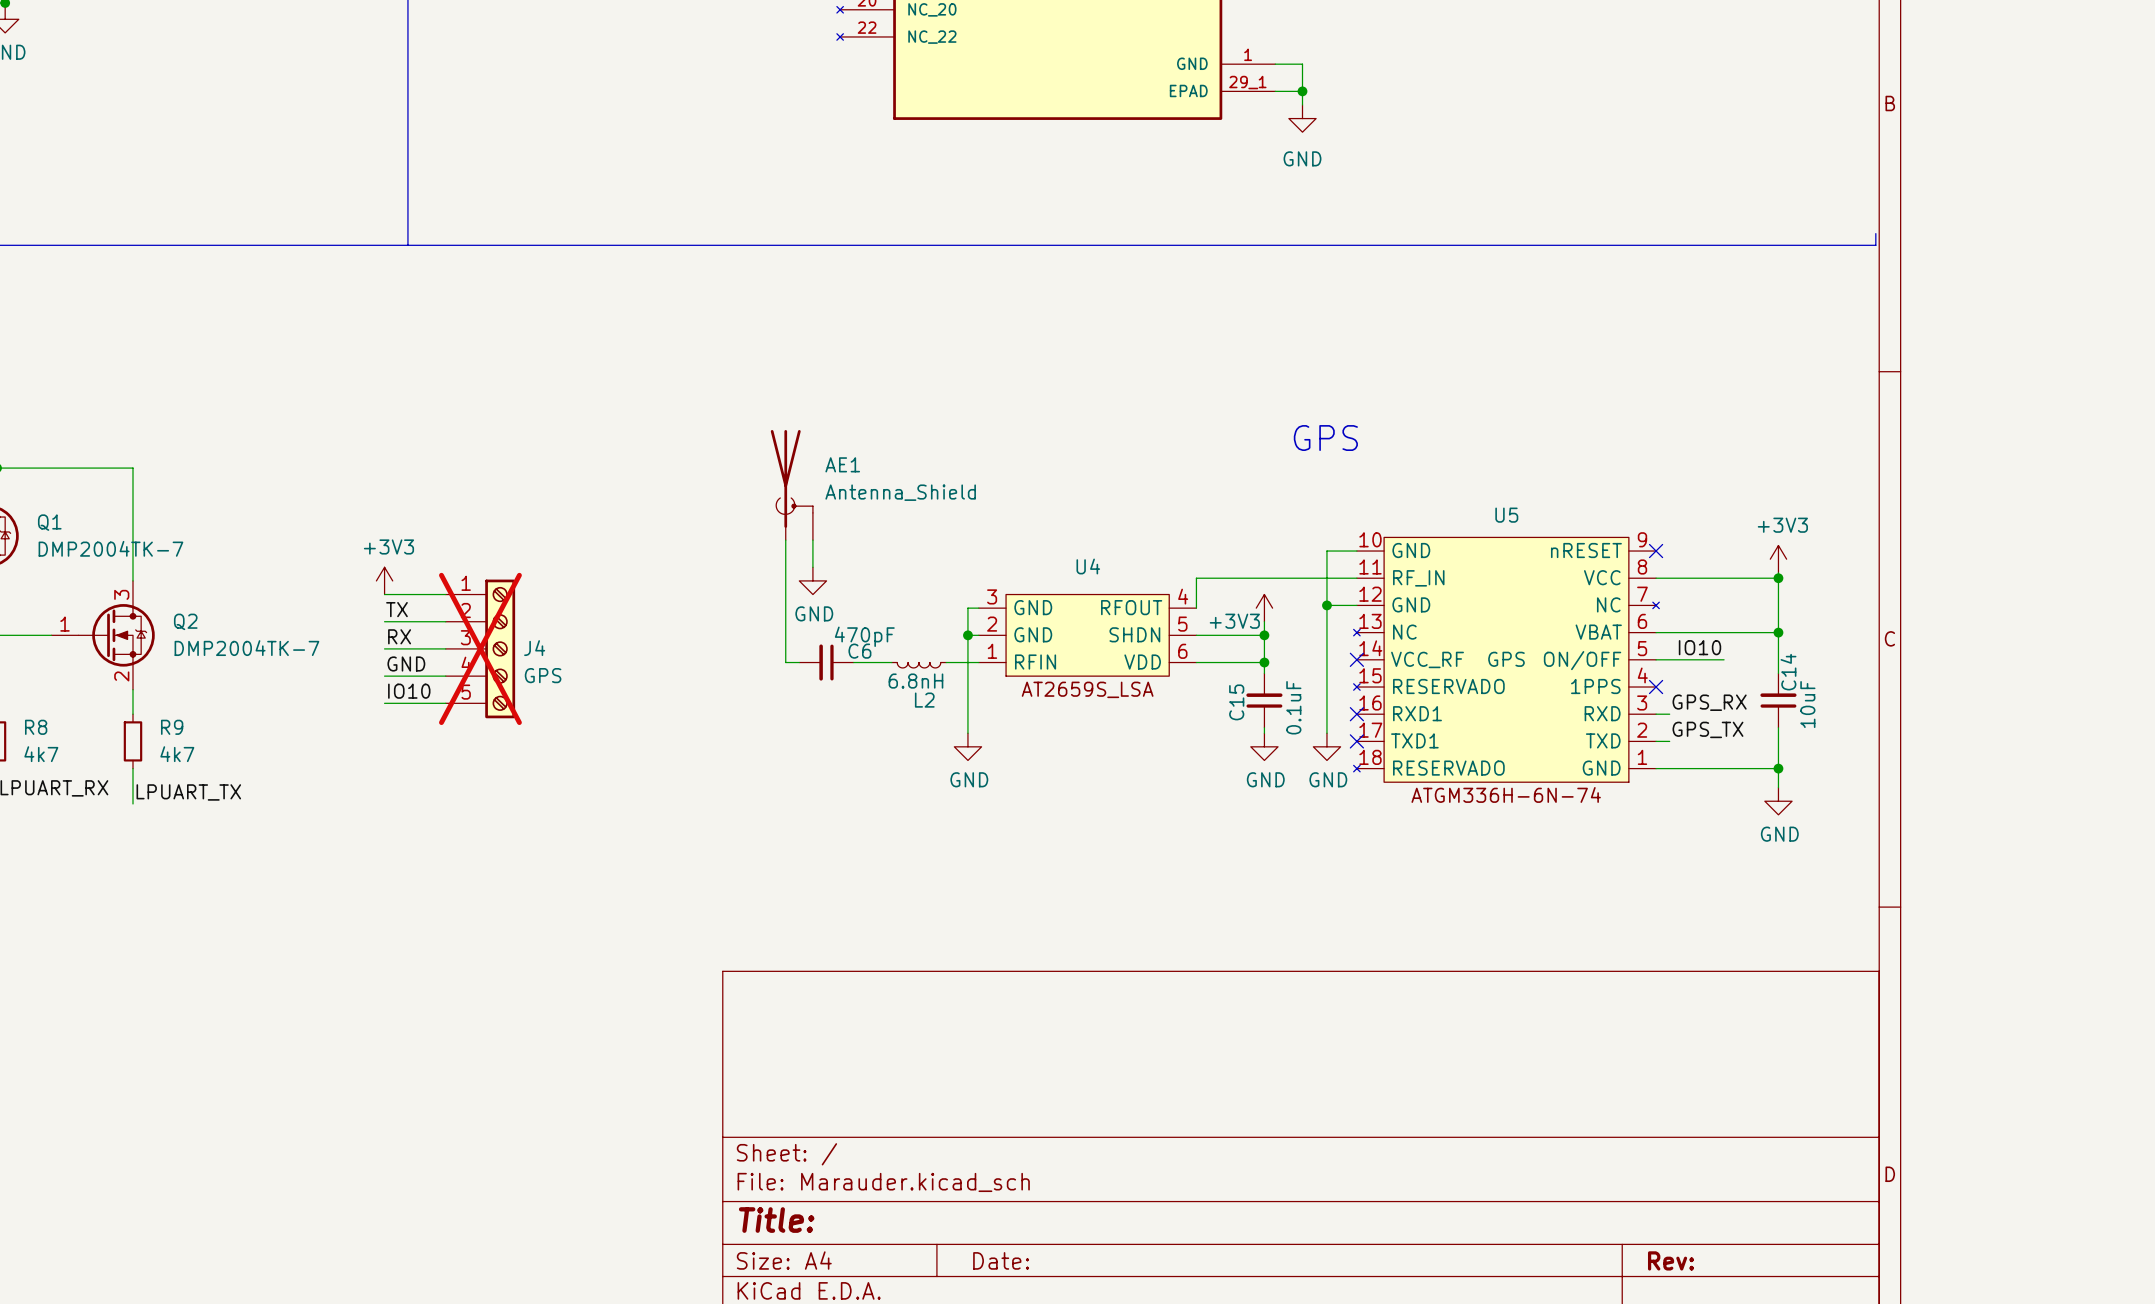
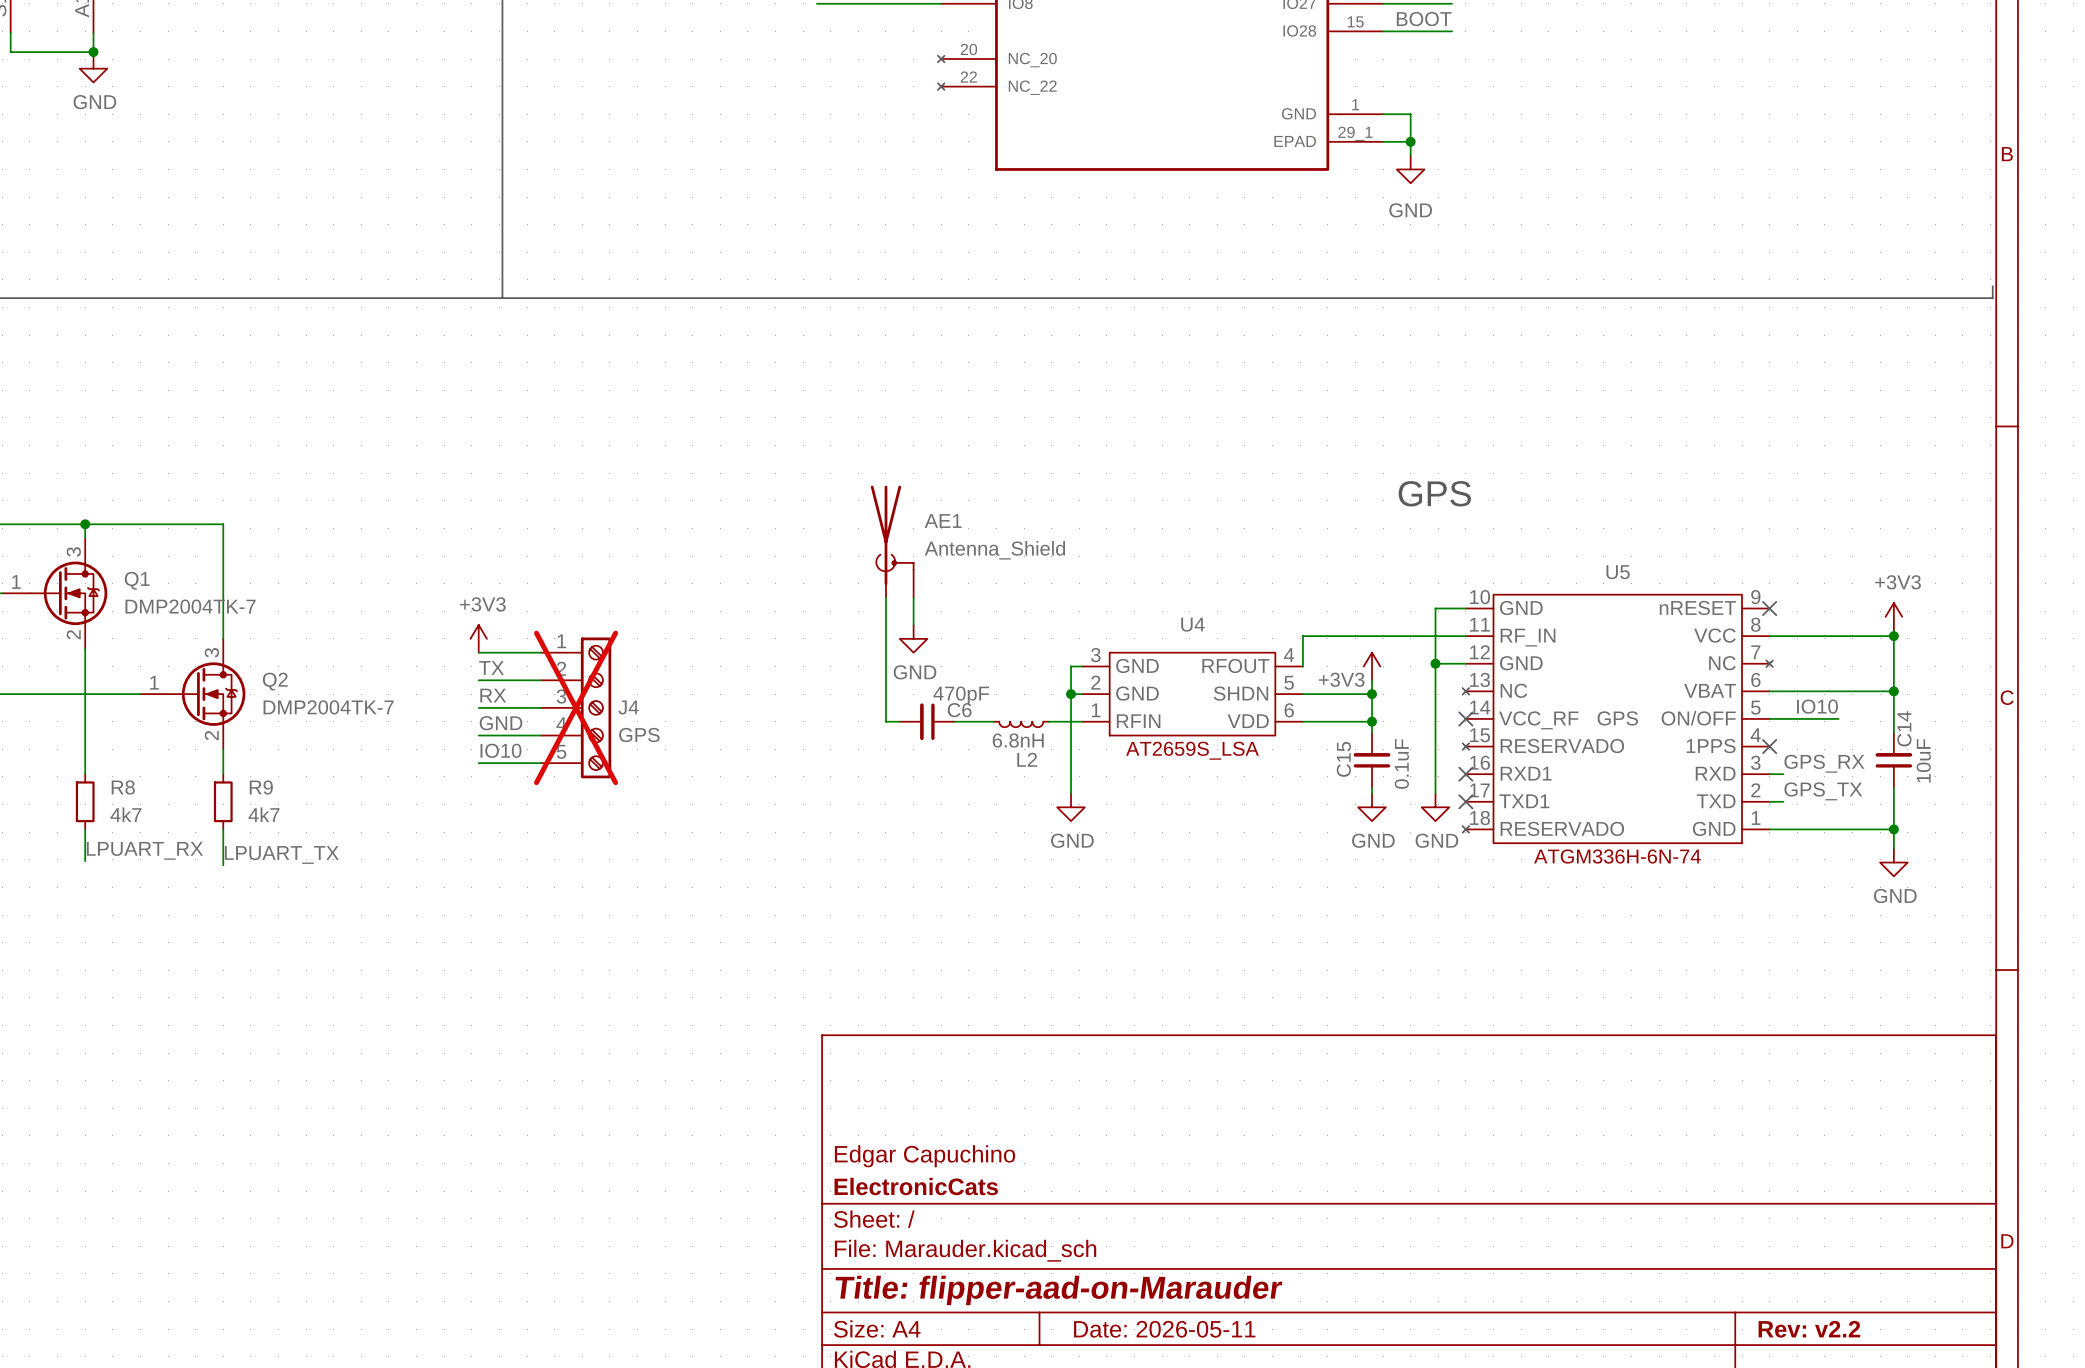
title block: none -> Edgar Capuchino (925, 1156)
title block: none -> ElectronicCats (916, 1186)
title block: Title: (776, 1220) -> Title: flipper-aad-on-Marauder (1058, 1290)
title block: Date: (1001, 1260) -> Date: 2026-05-11 (1164, 1329)
title block: Rev: (1671, 1260) -> Rev: v2.2 (1809, 1329)

